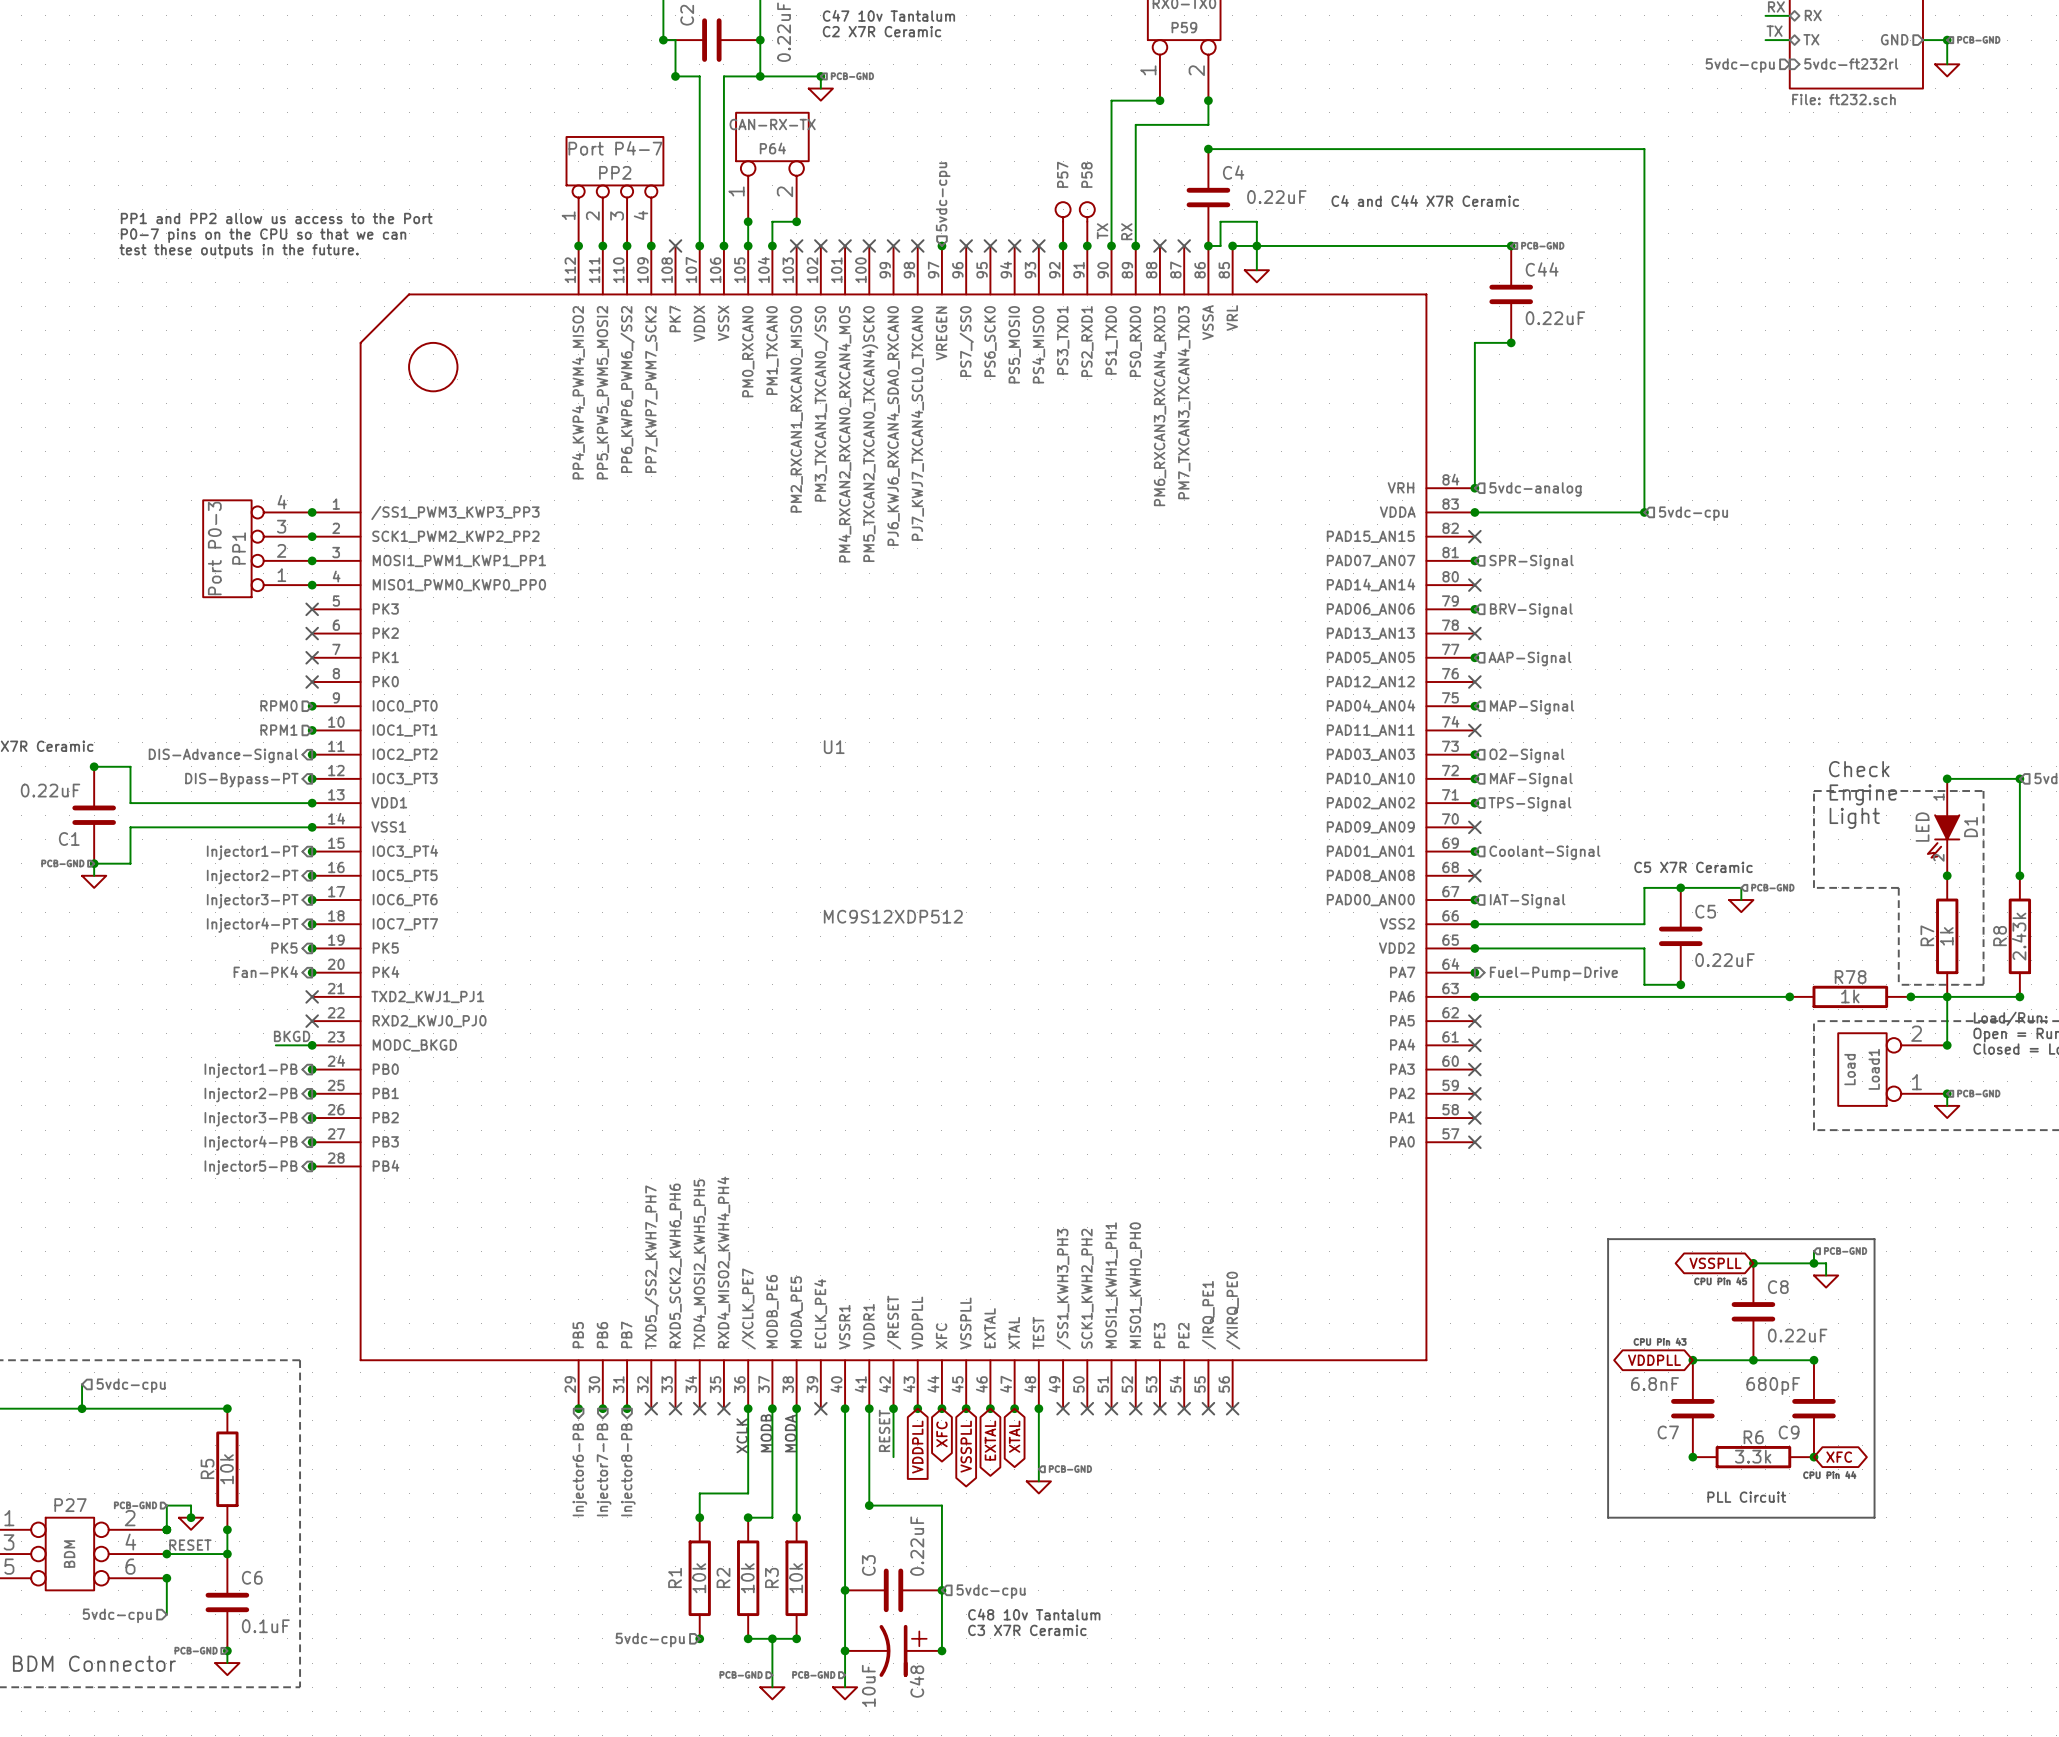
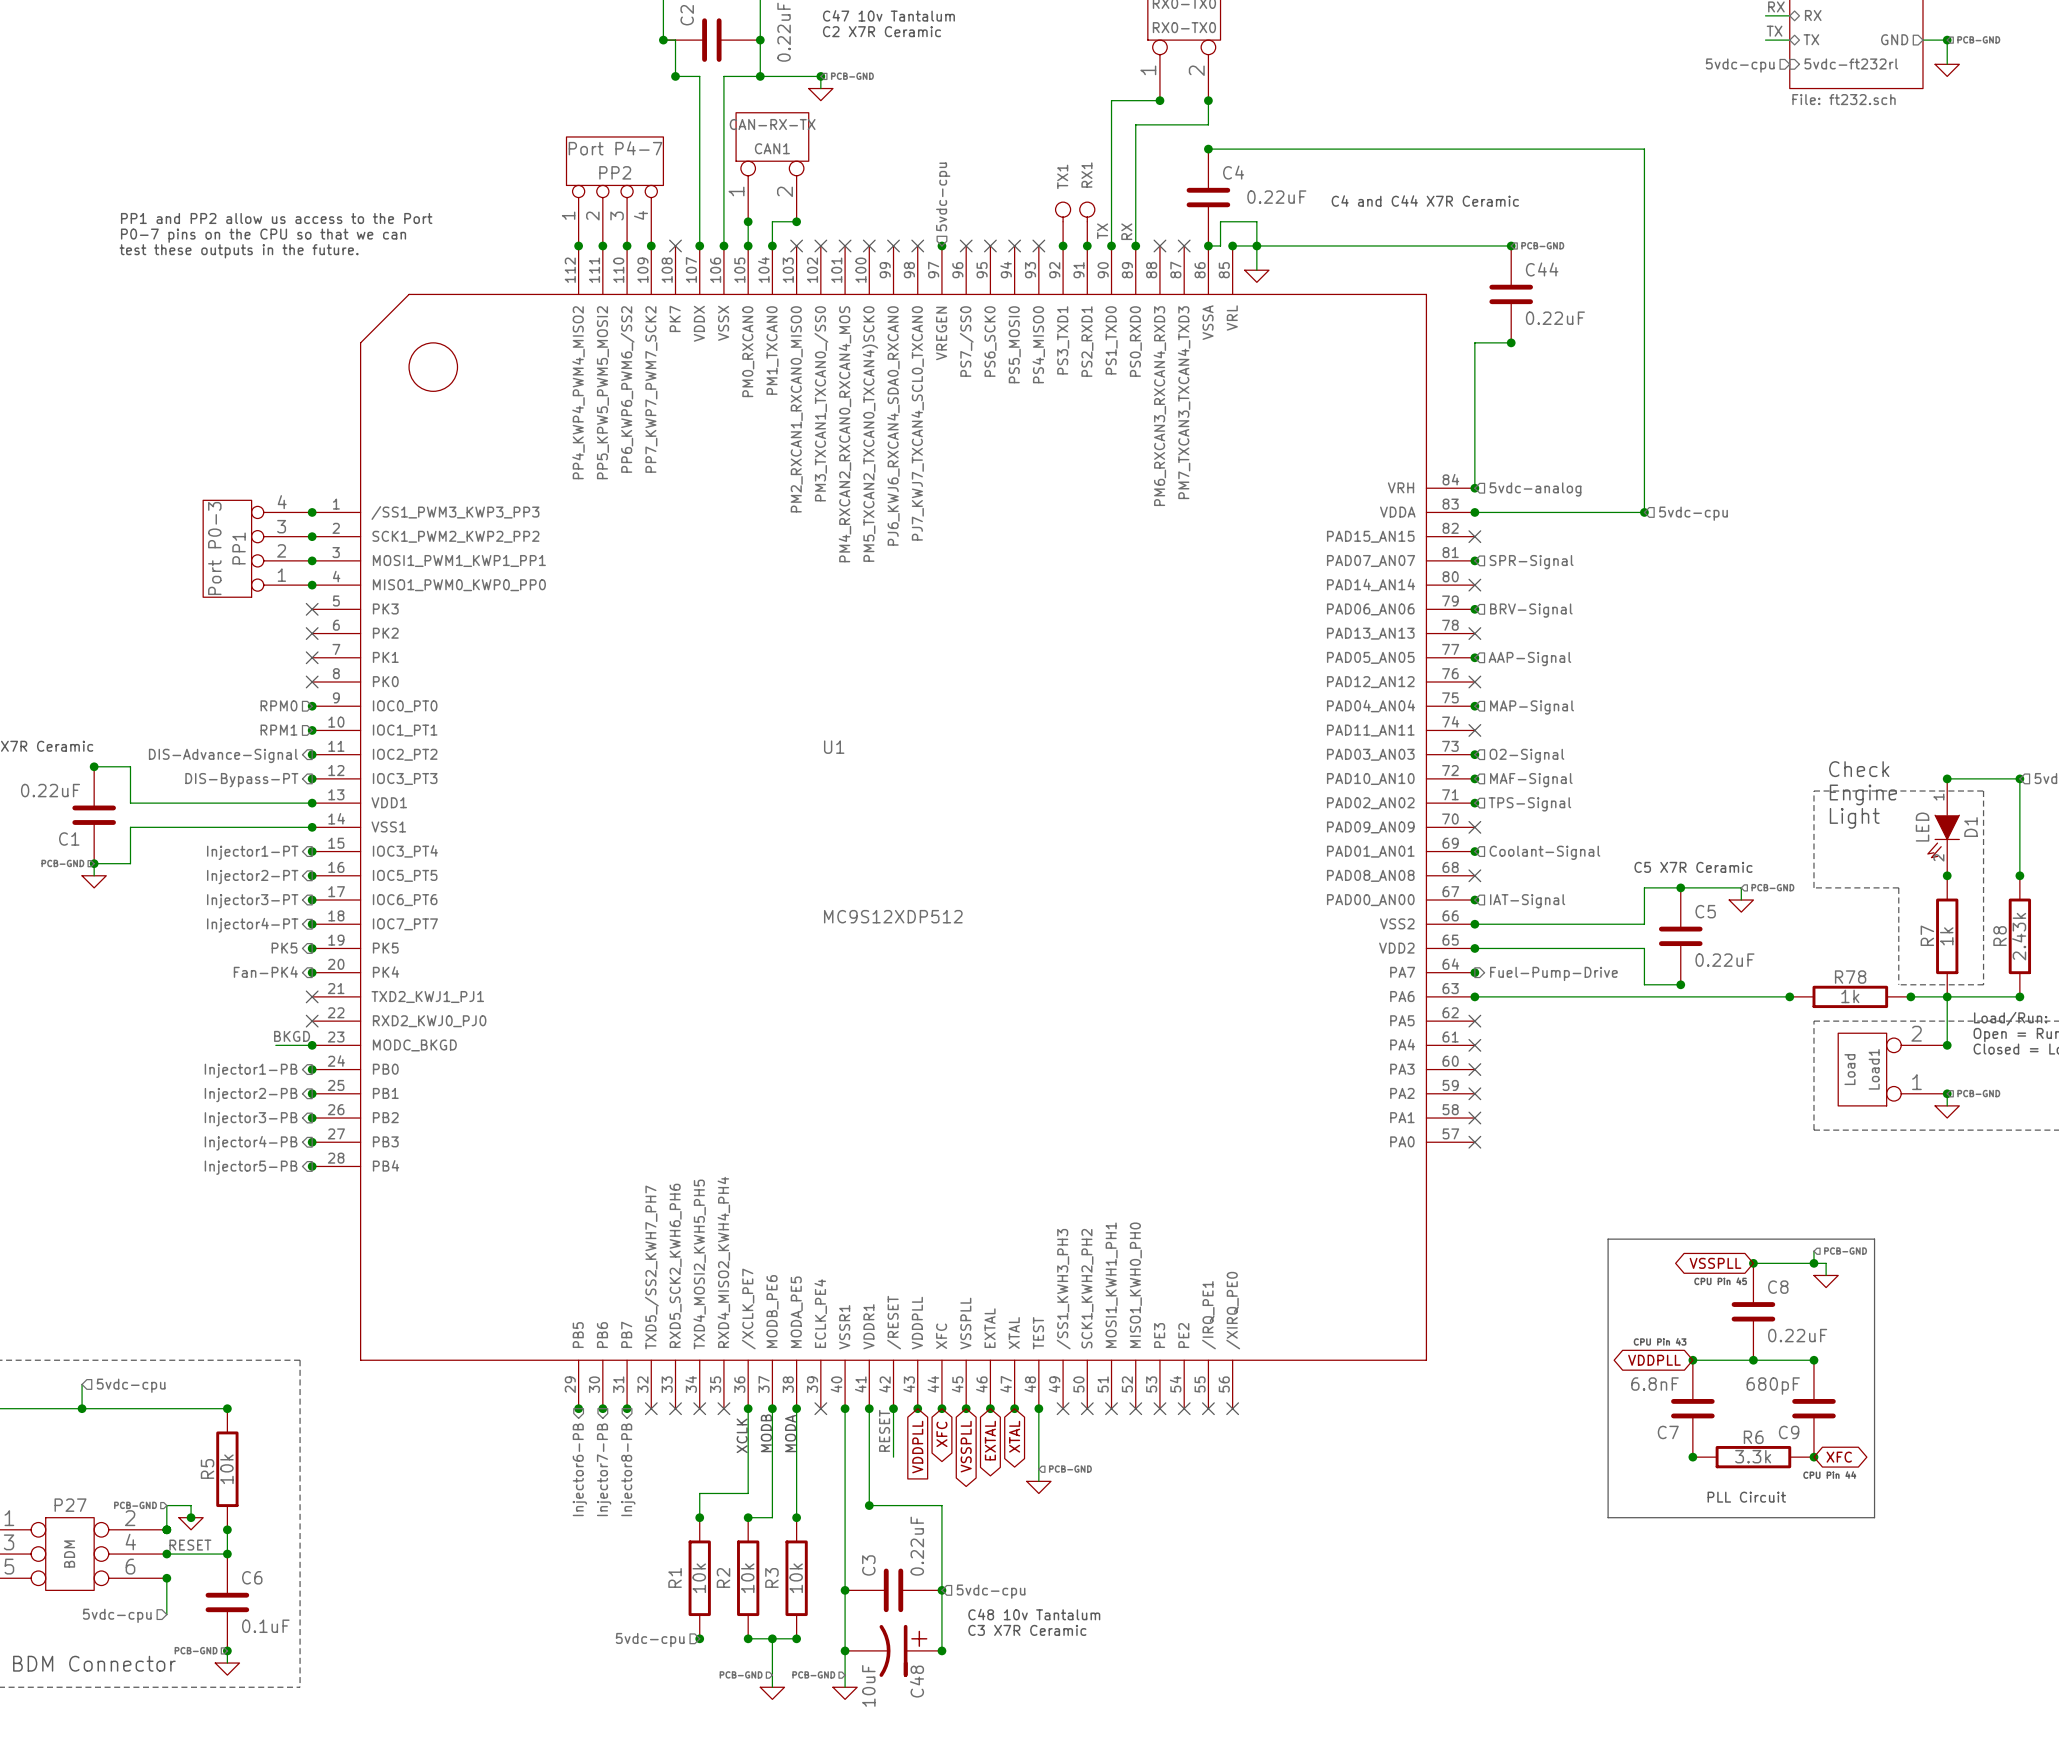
P59 name: P59 (1184, 27) -> RX0-TX0 (1184, 27)
P64 name: P64 (772, 148) -> CAN1 (772, 148)
P57 name: P57 (1062, 174) -> TX1 (1062, 176)
P58 name: P58 (1086, 175) -> RX1 (1086, 175)

